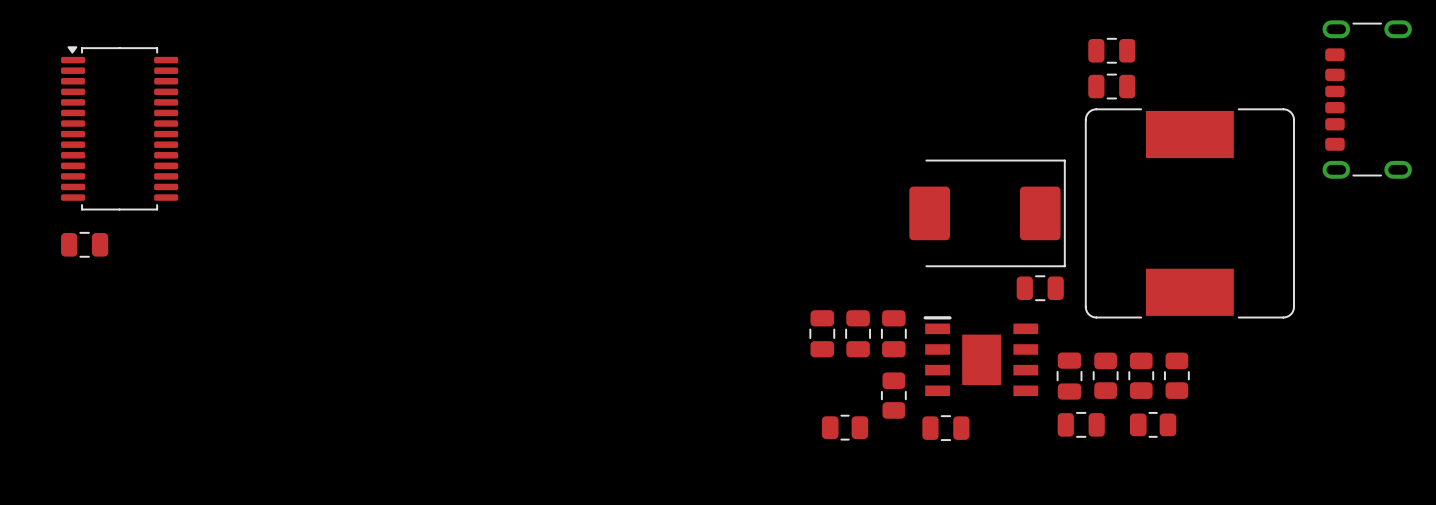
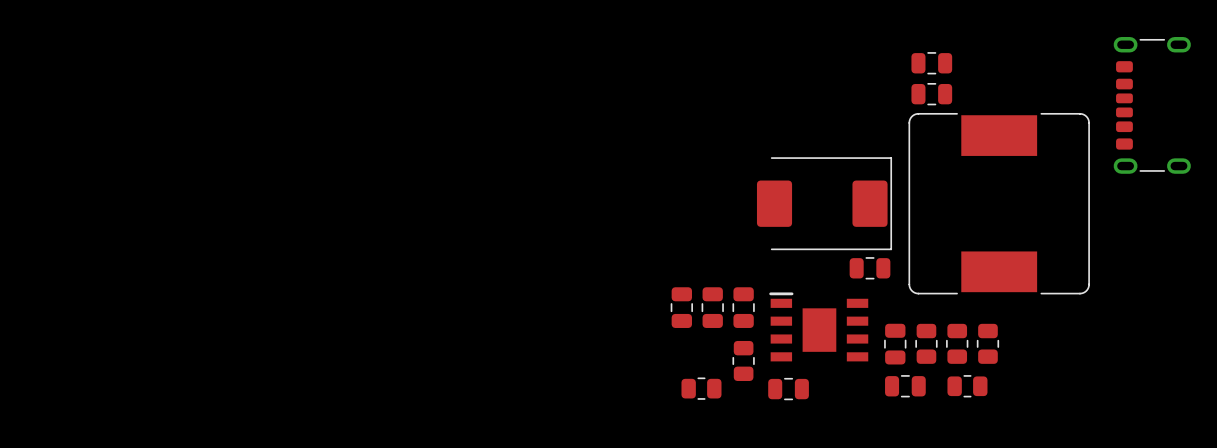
part: (119, 128) -> none
part: (84, 244) -> none

